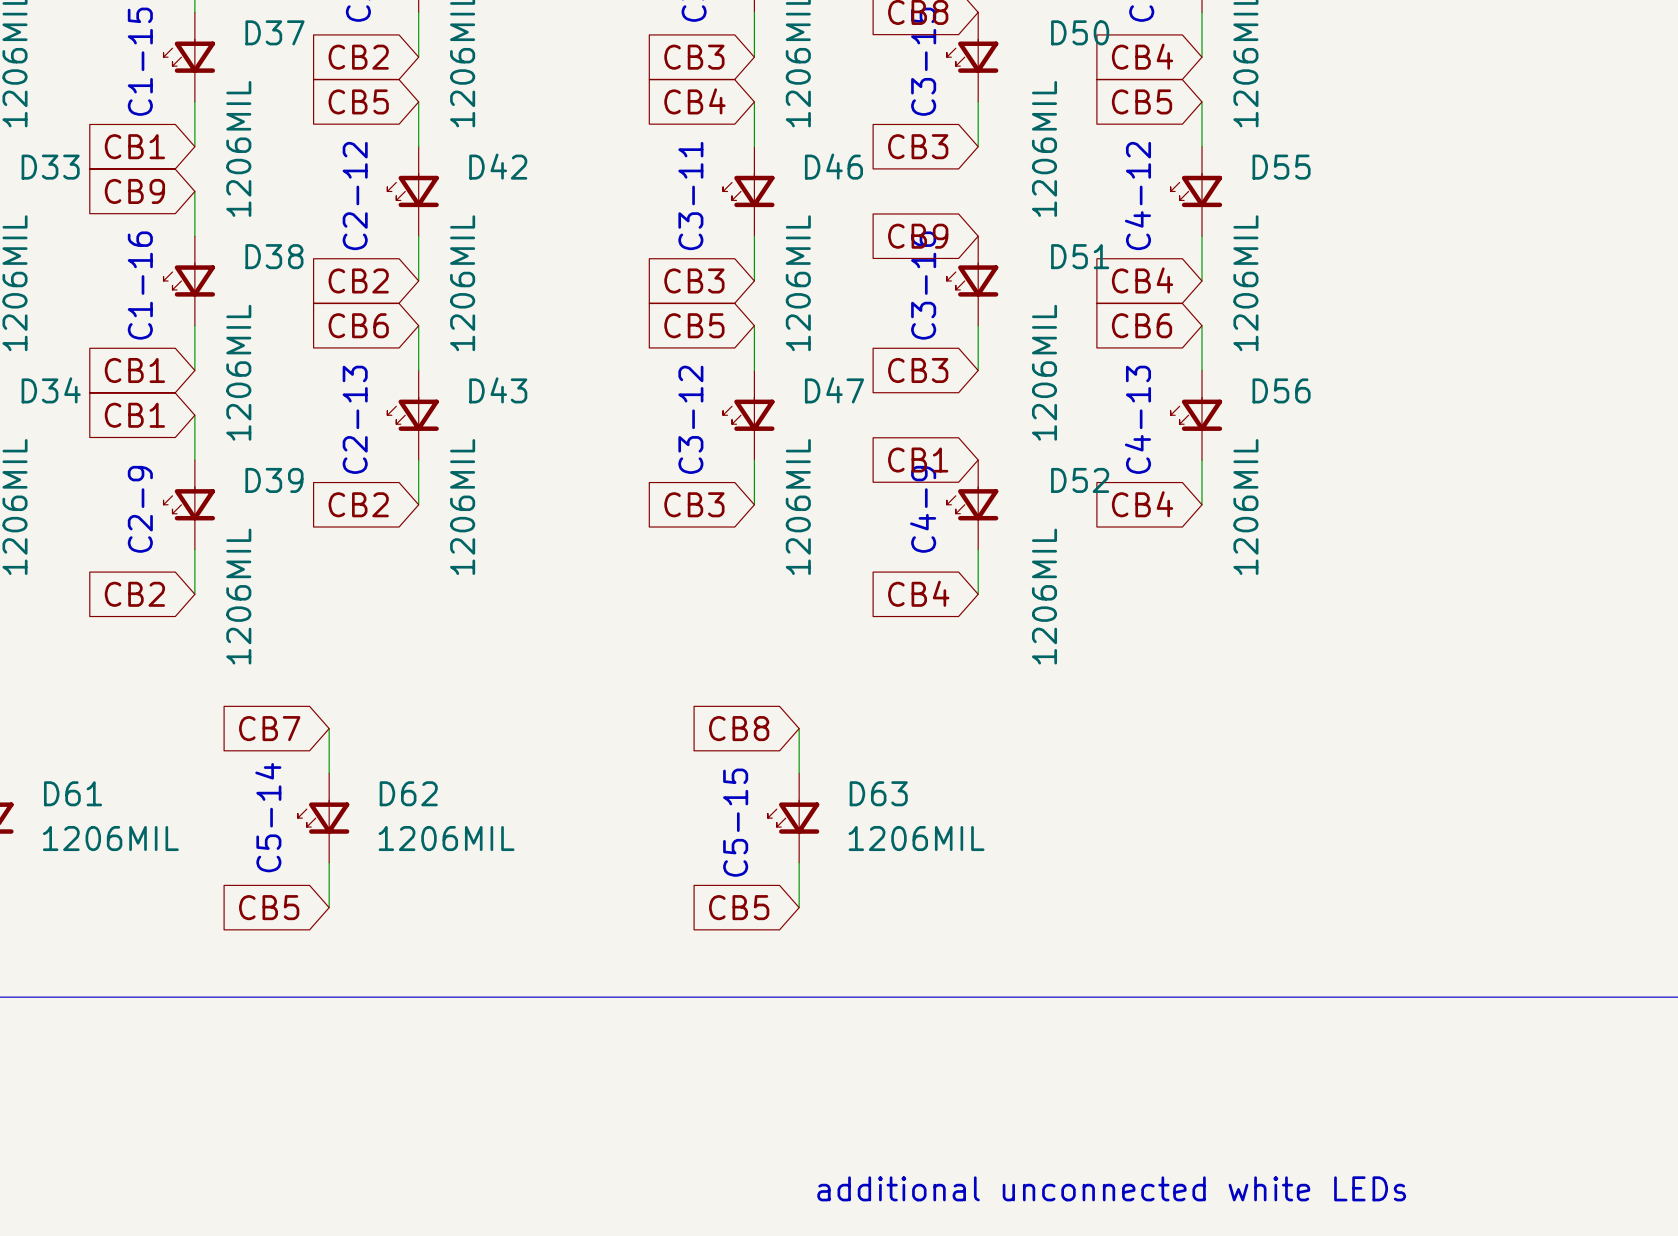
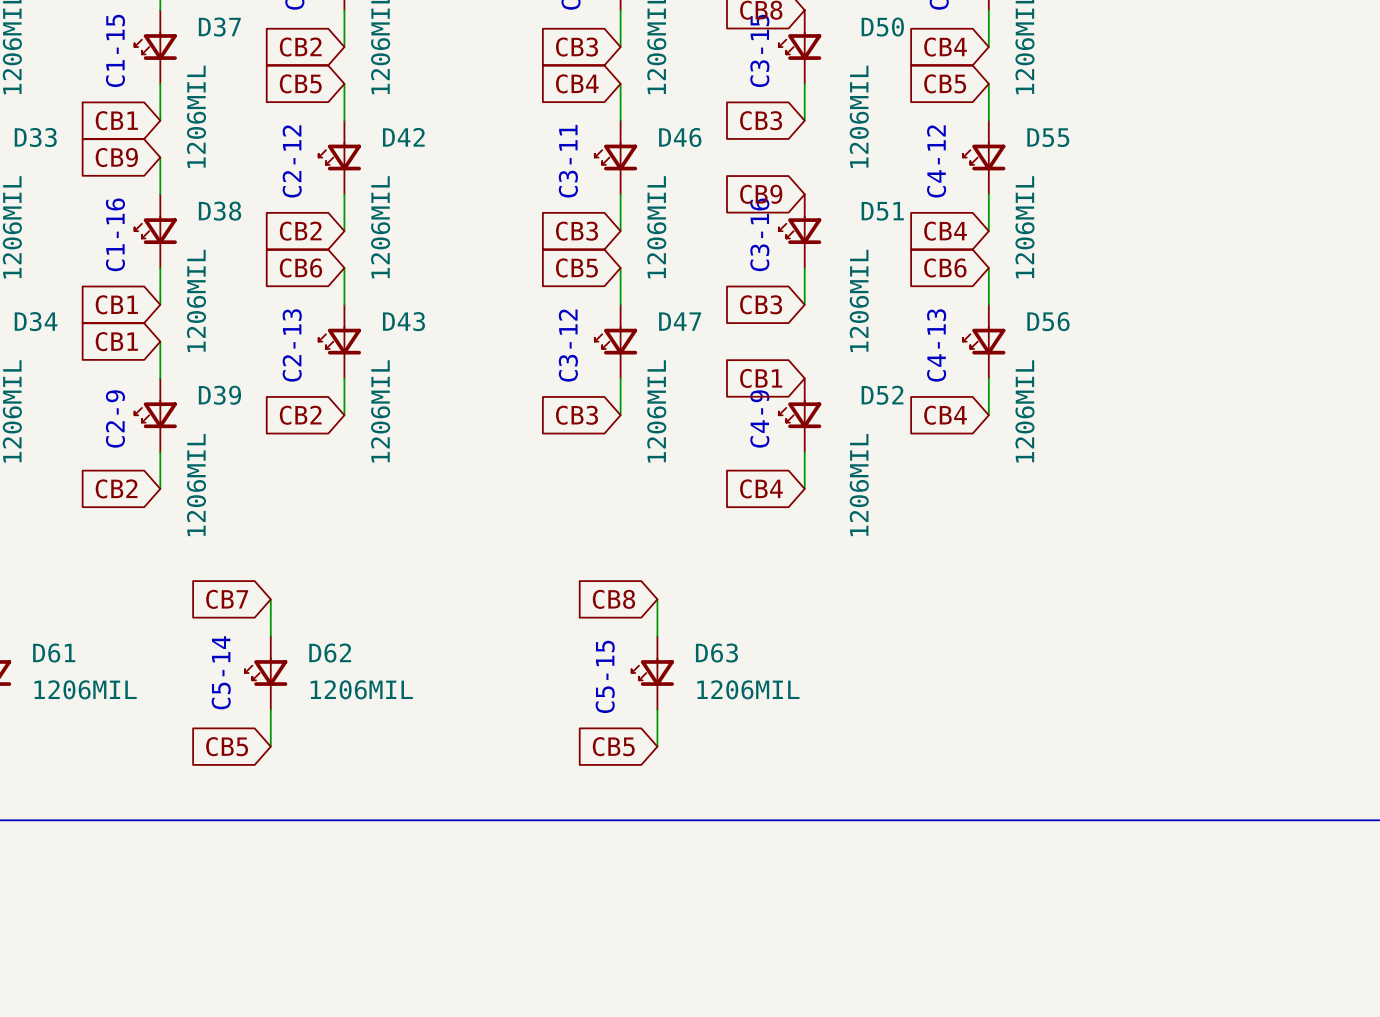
text: additional unconnected white LEDs (1111, 1188) -> none

